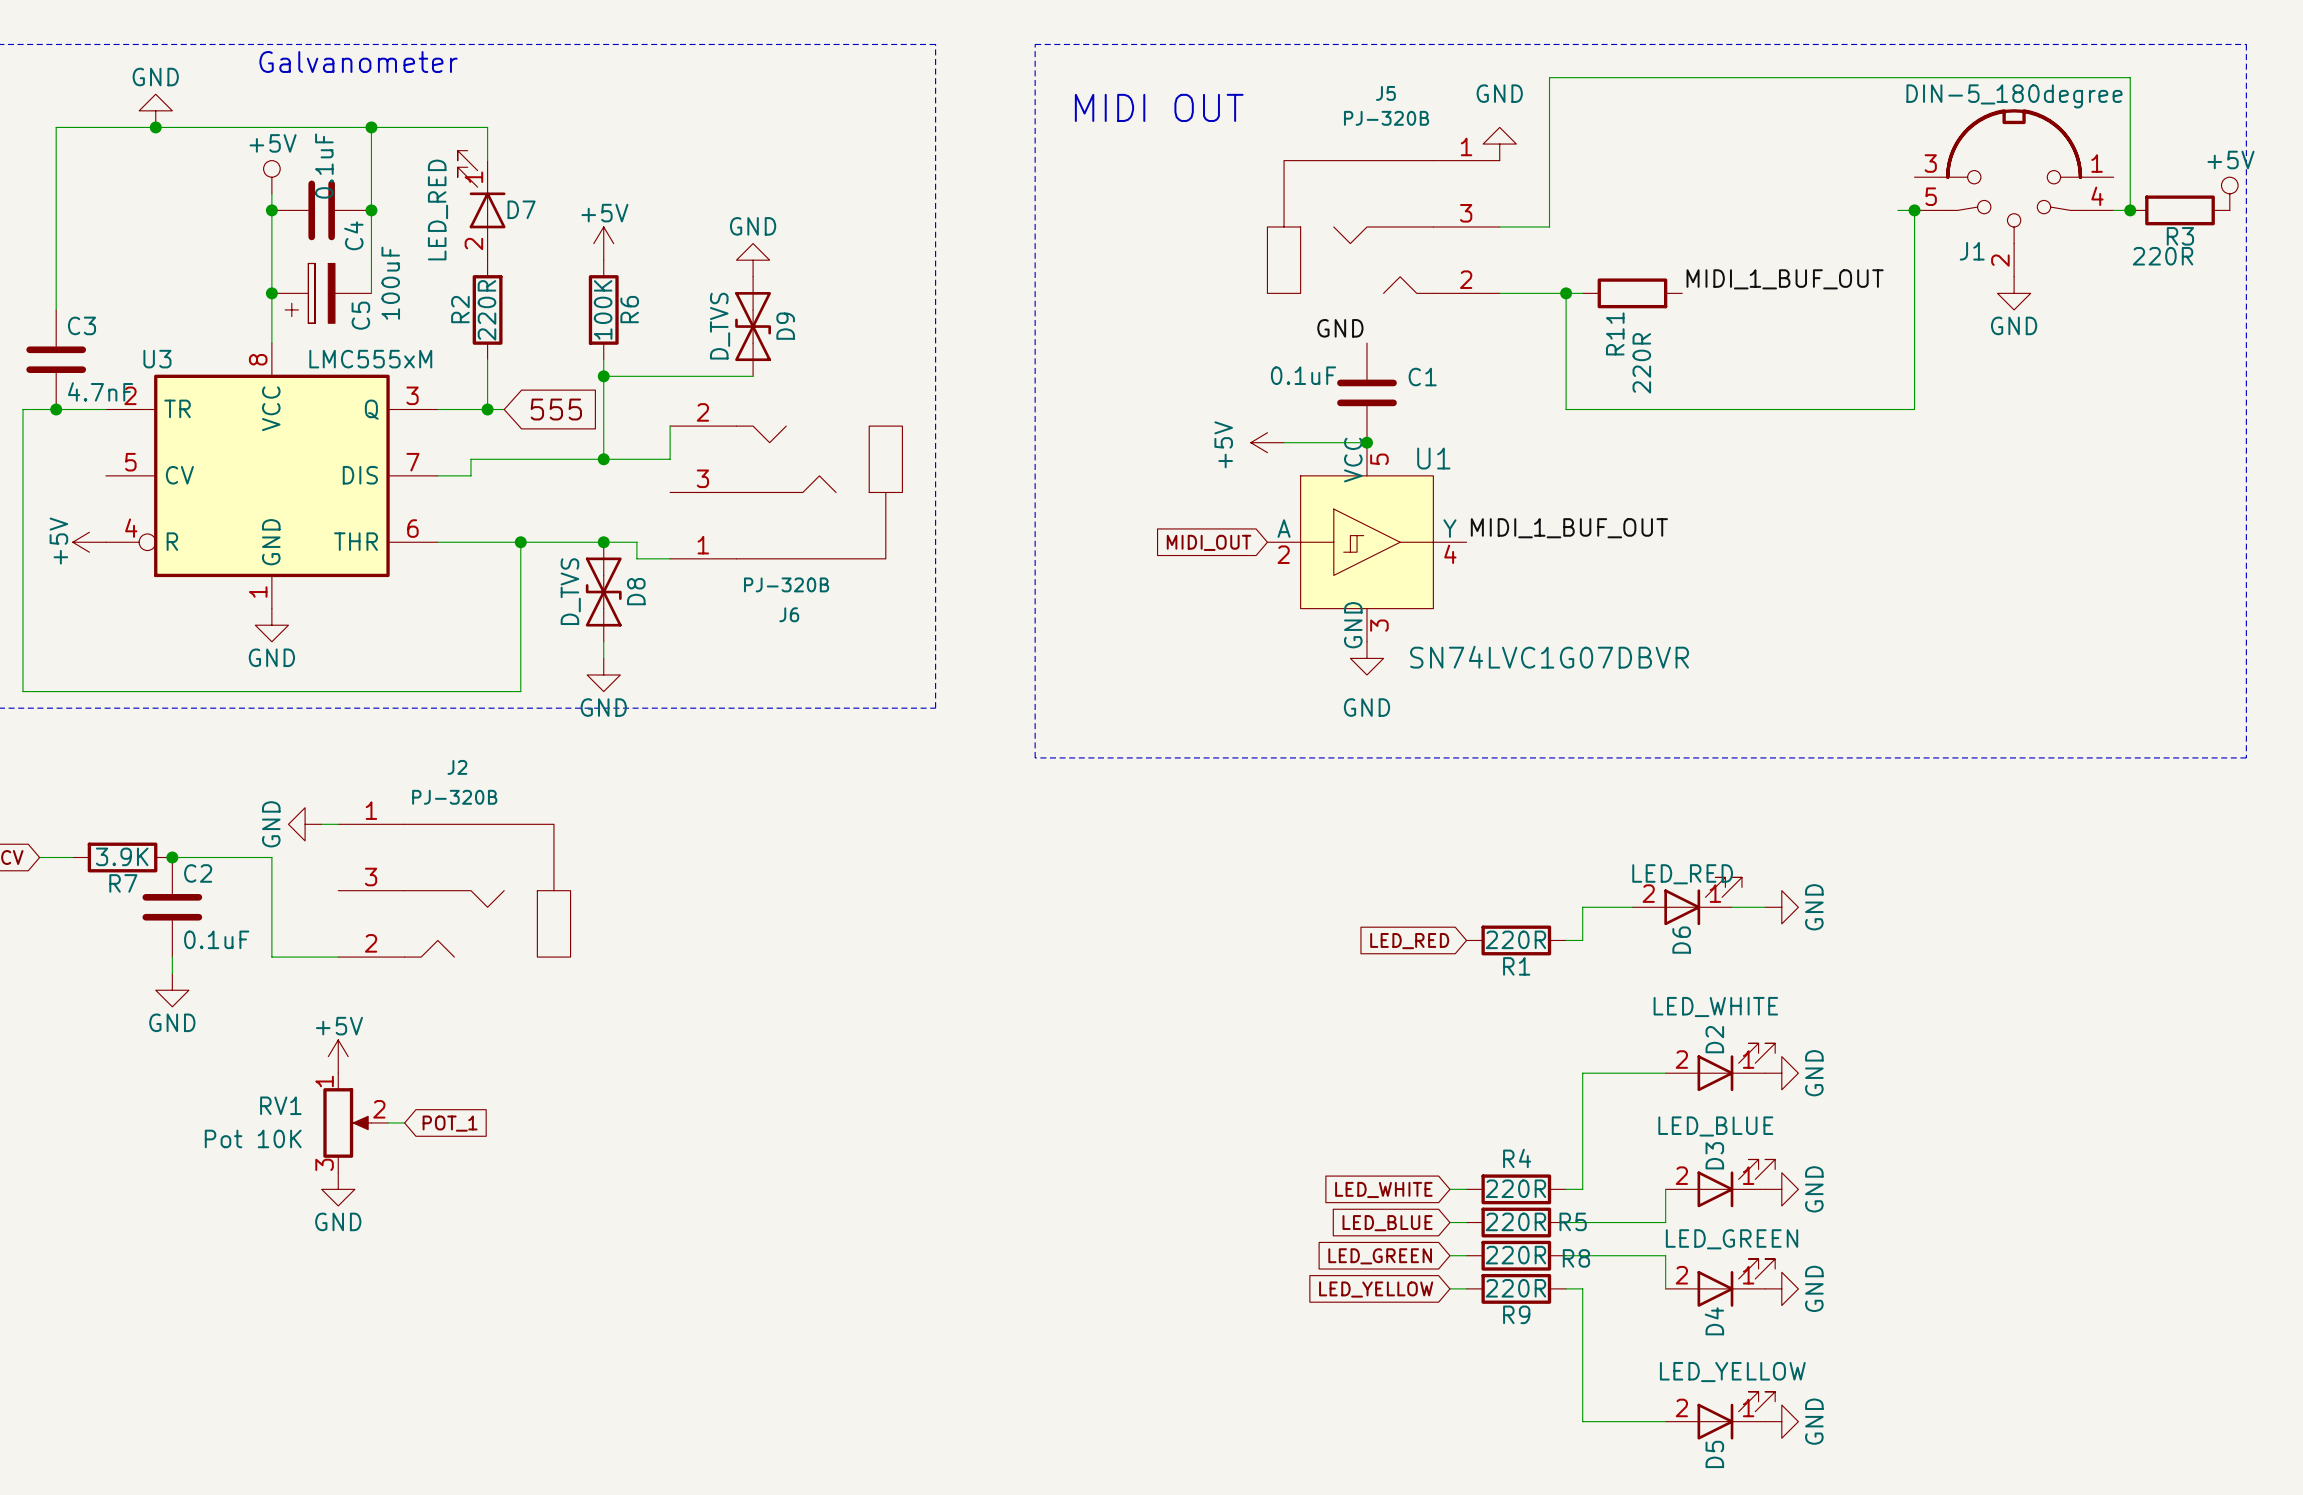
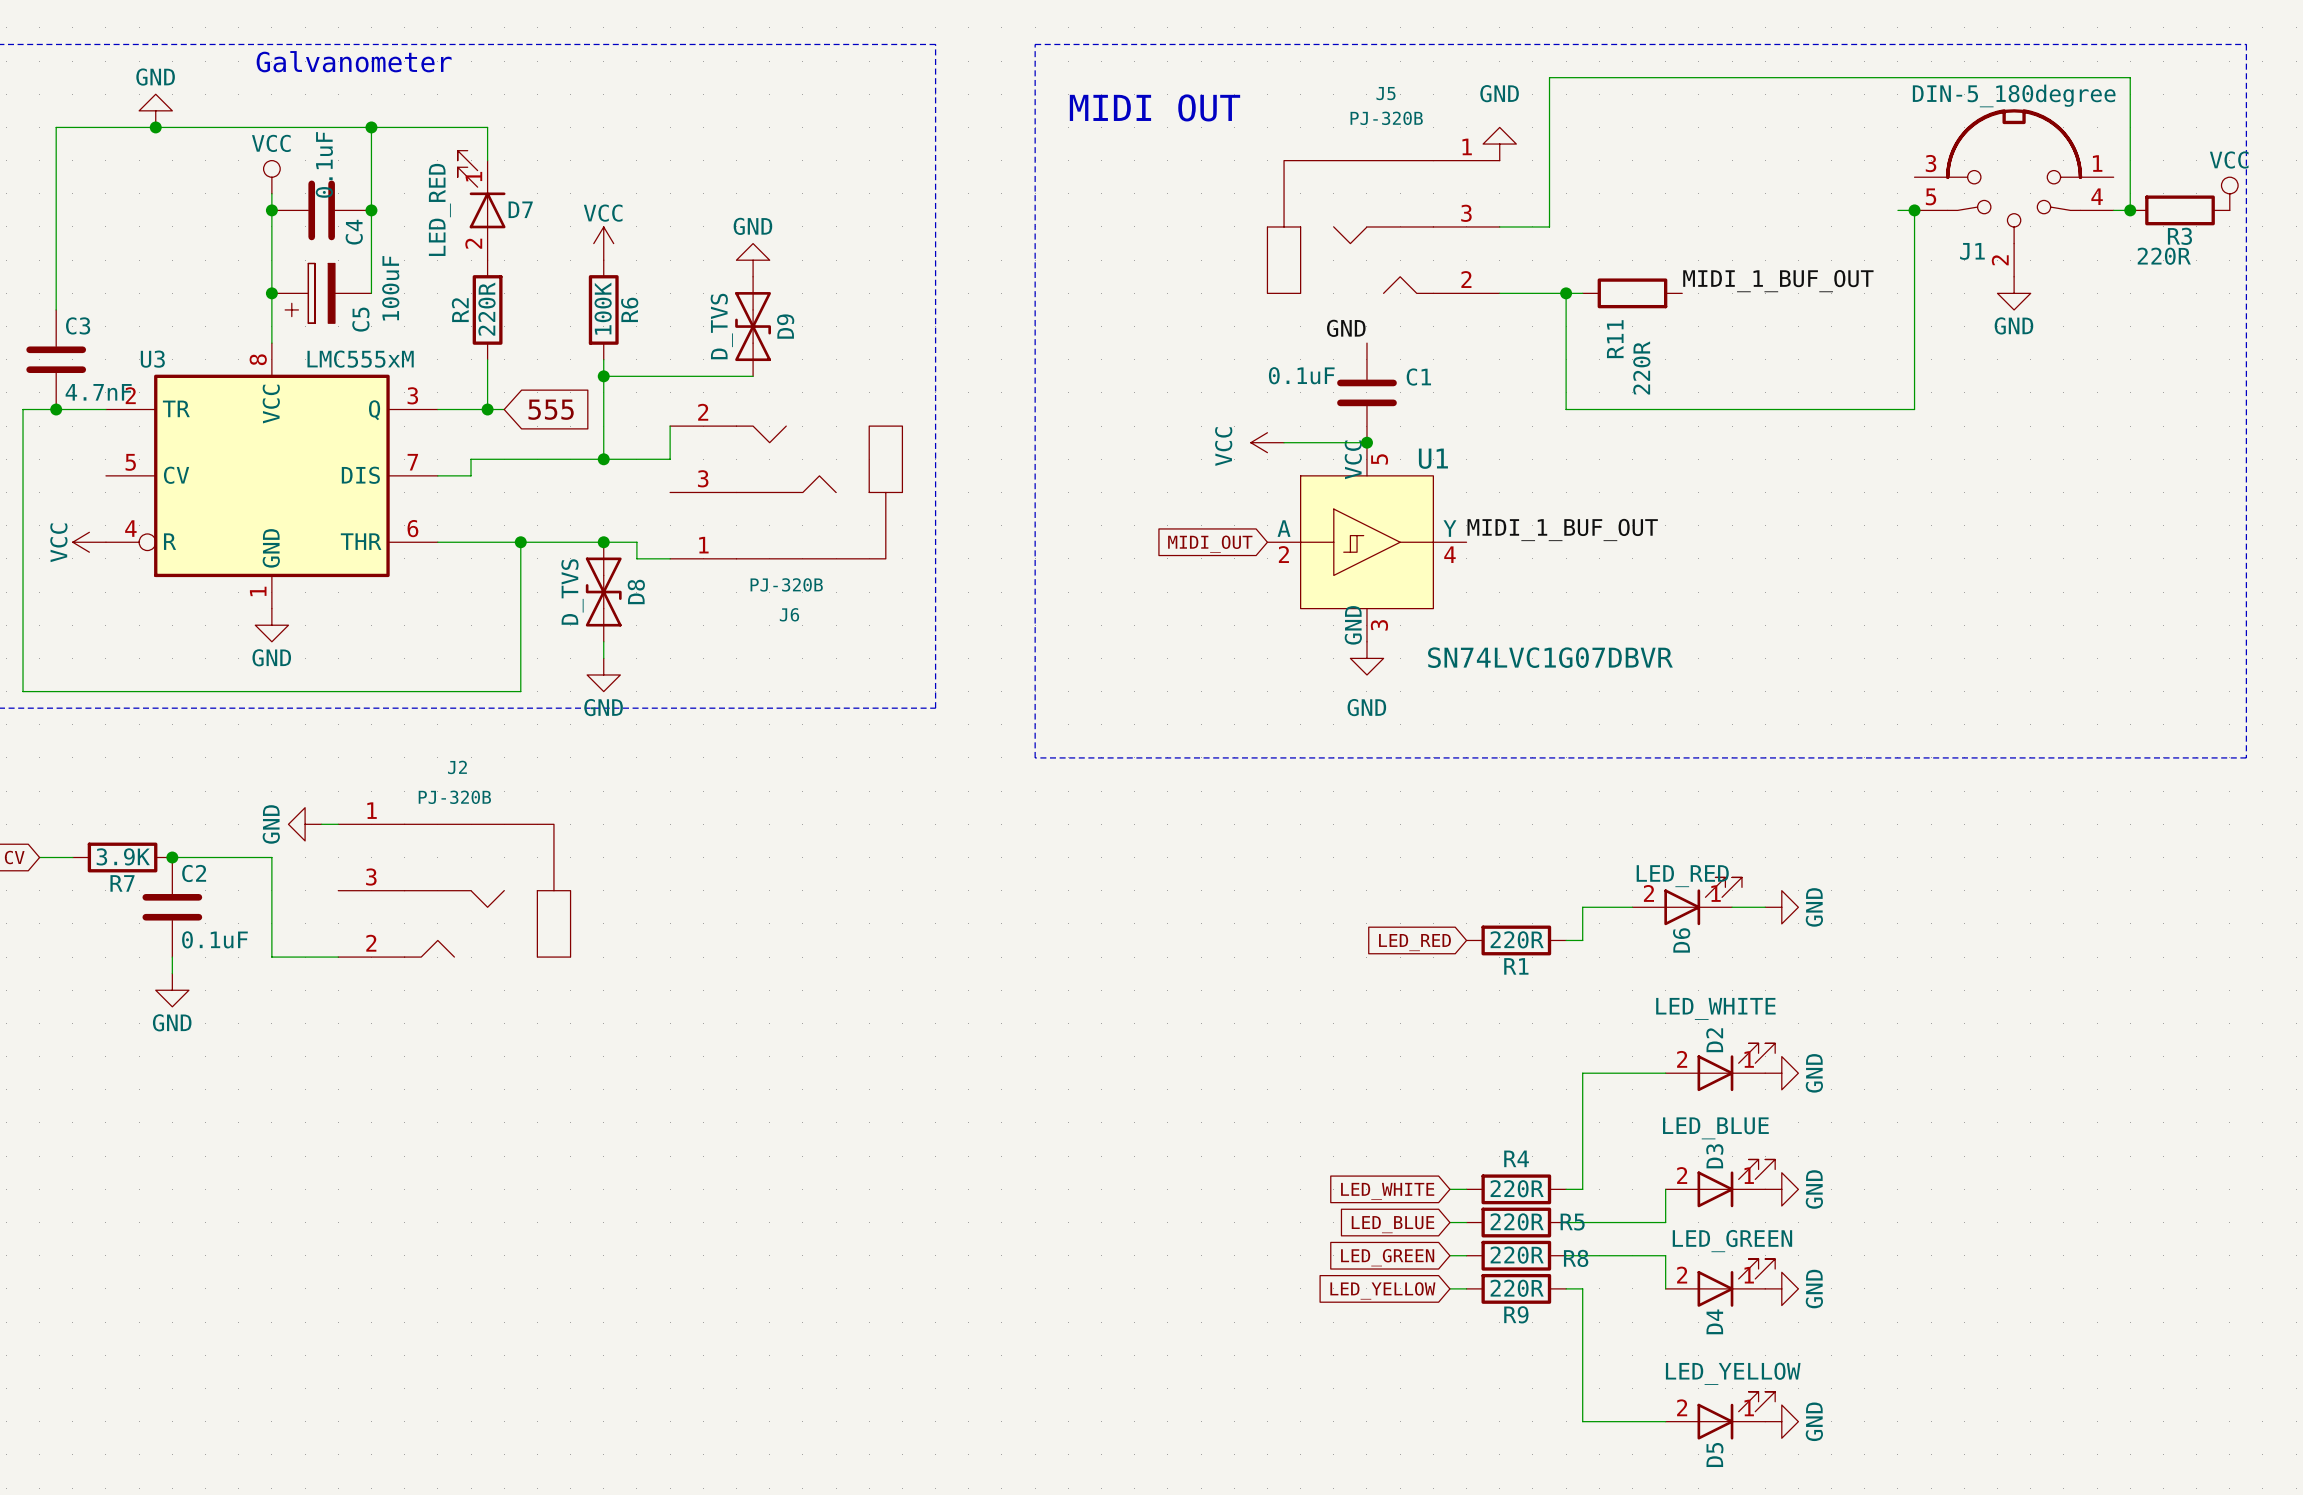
power symbol: +5V (271, 177) -> VCC (271, 177)
power symbol: +5V (2229, 193) -> VCC (2229, 193)
power symbol: +5V (603, 243) -> VCC (603, 243)
power symbol: +5V (1267, 442) -> VCC (1267, 442)
power symbol: +5V (89, 542) -> VCC (89, 542)
power symbol: +5V (338, 1056) -> none
RV1: Pot 10K (355, 1122) -> none
wire: (388, 1122) (404, 1122) -> none
global label: POT_1 (450, 1123) -> none
power symbol: GND (338, 1189) -> none

